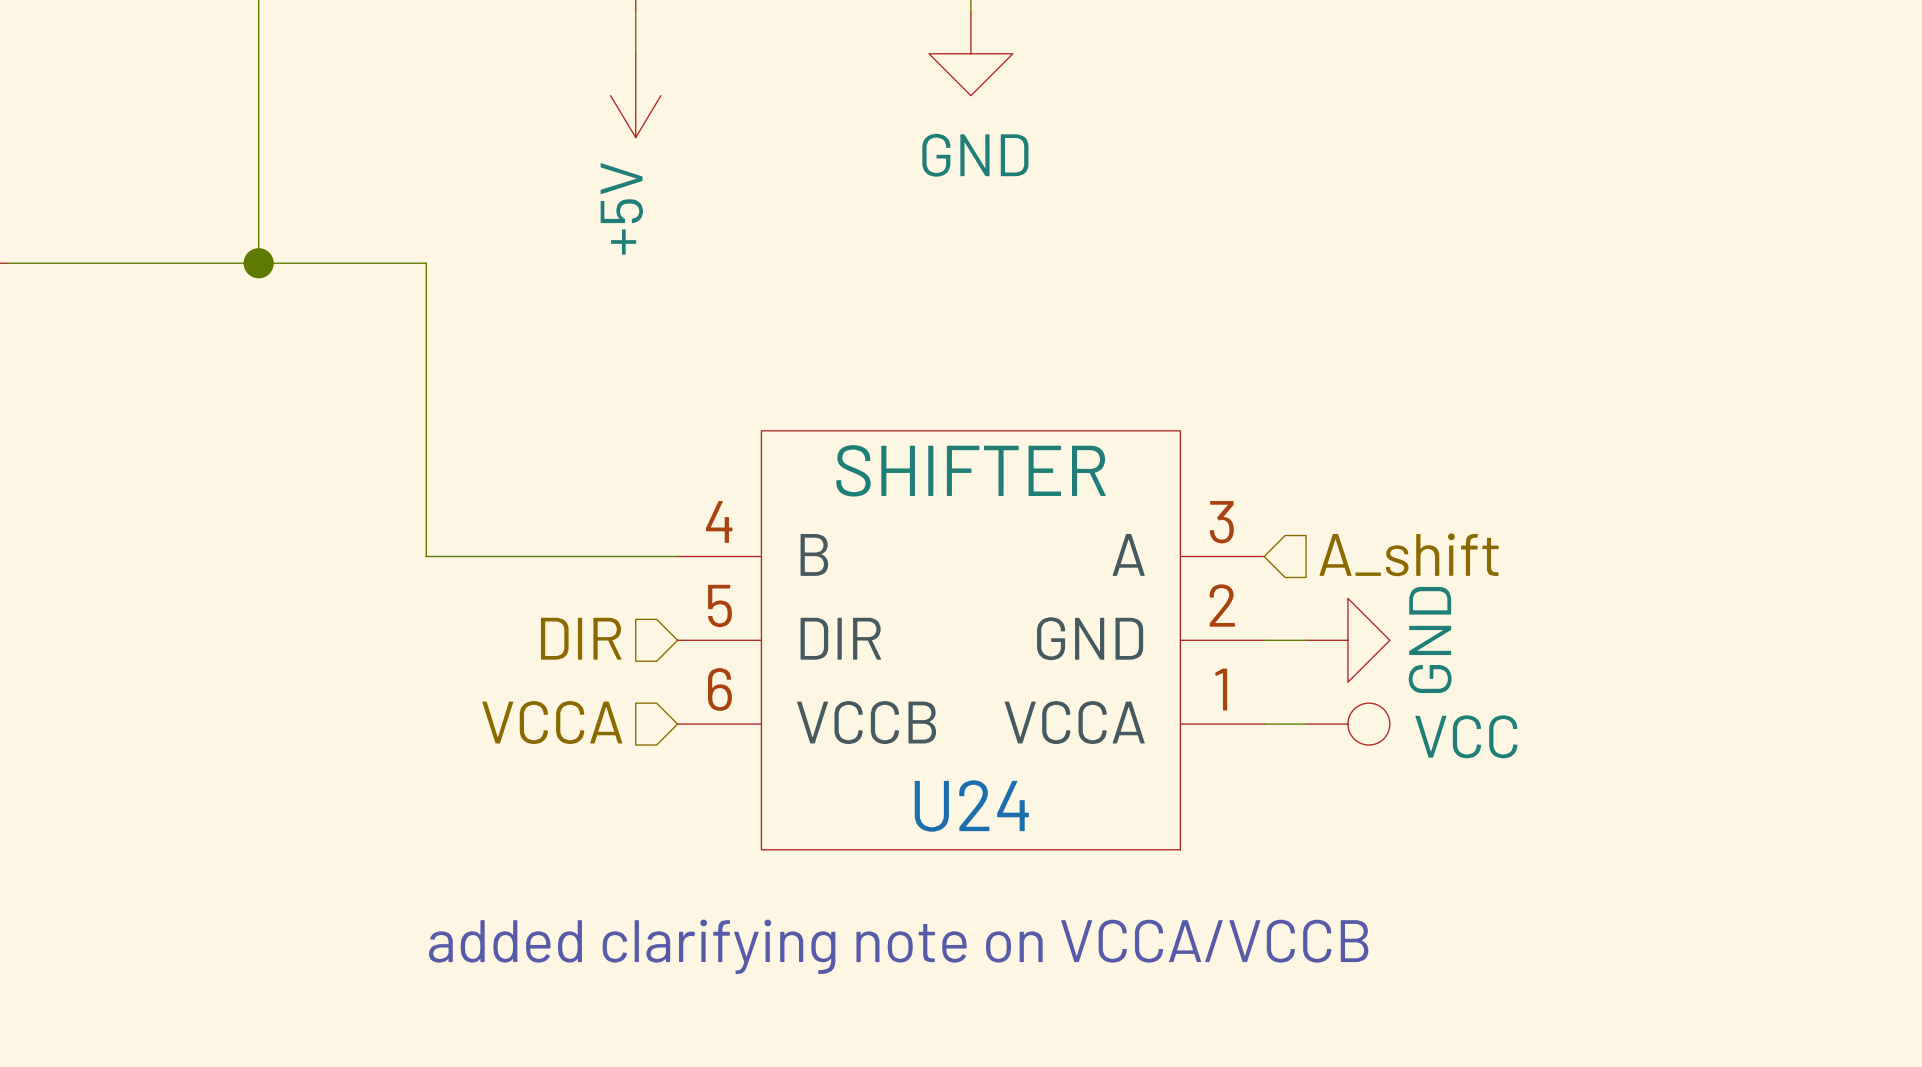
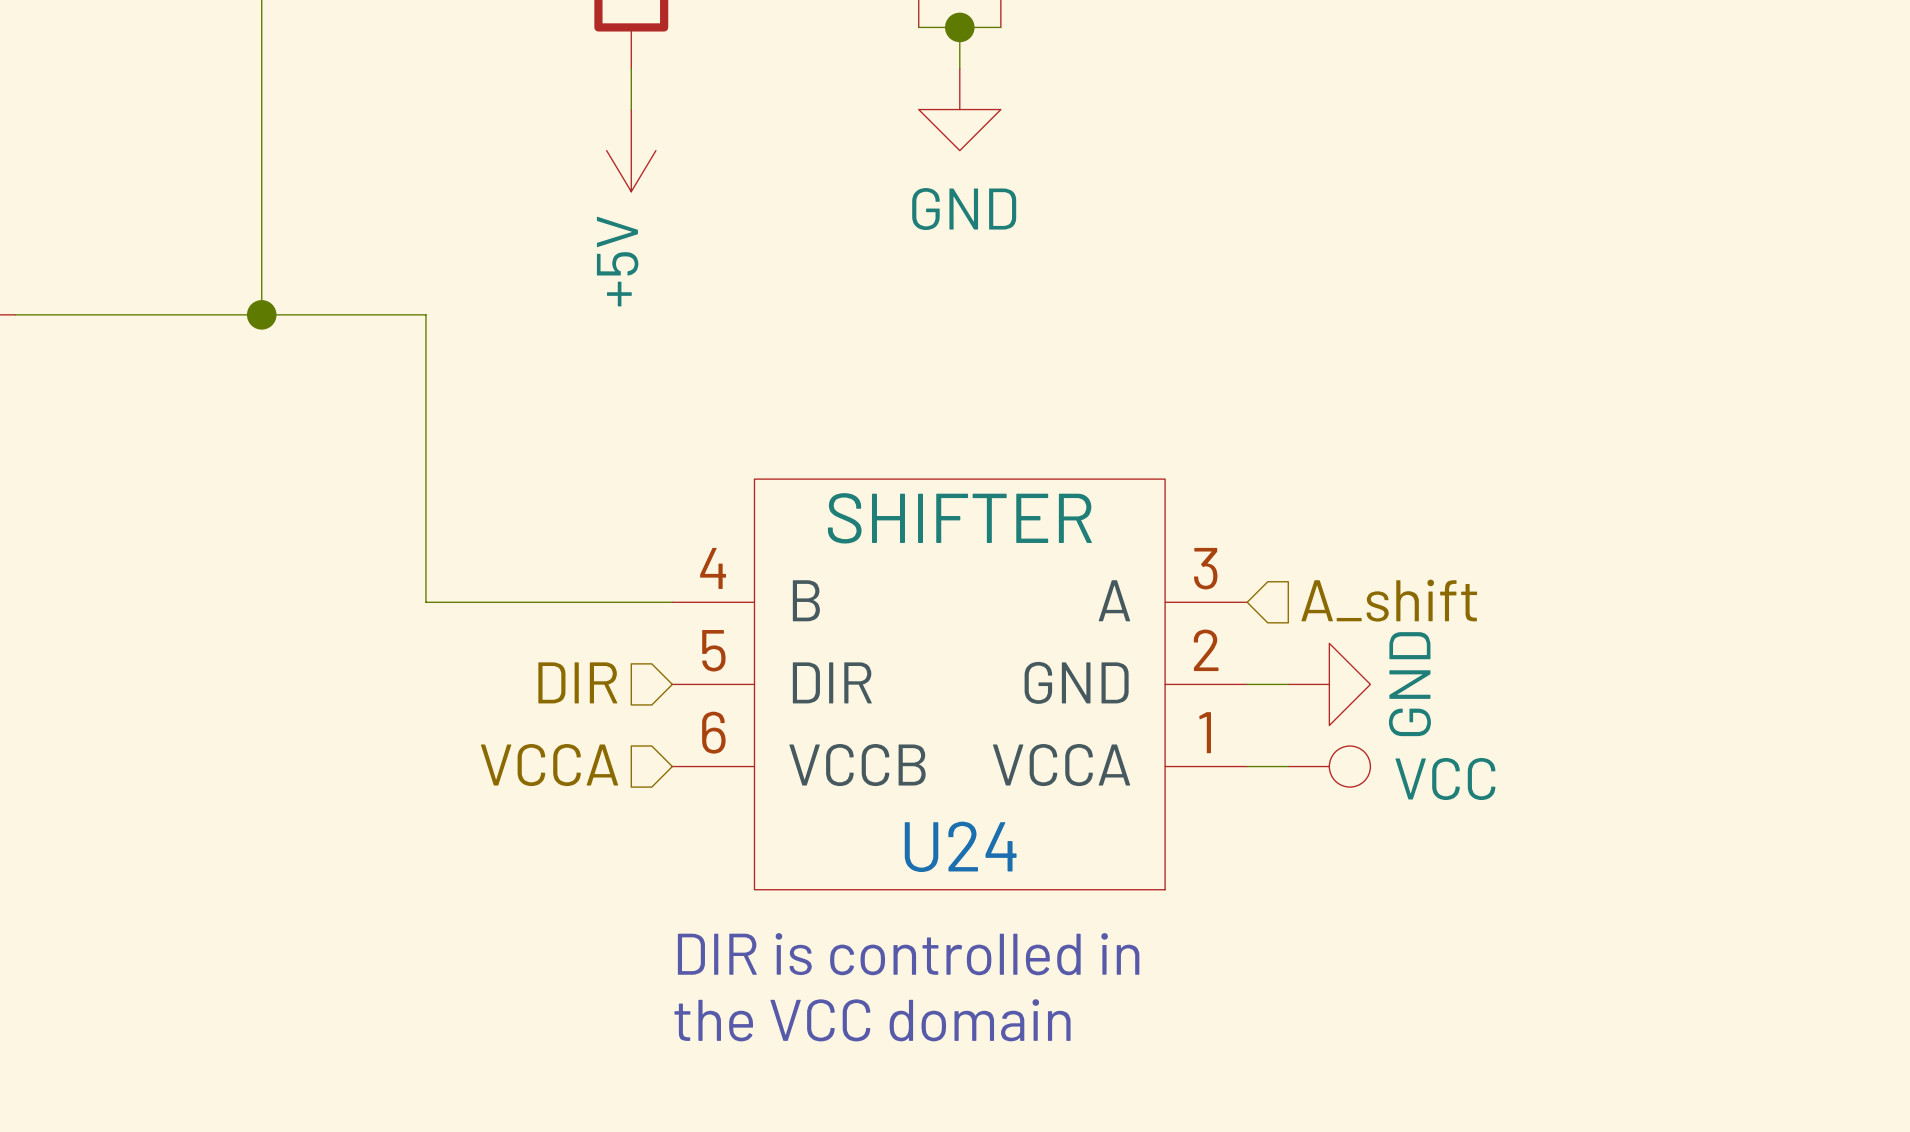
text: none -> DIR is controlled in (908, 954)
text: added clarifying note on VCCA/VCCB (898, 946) -> none
text: none -> the VCC domain (872, 1020)

